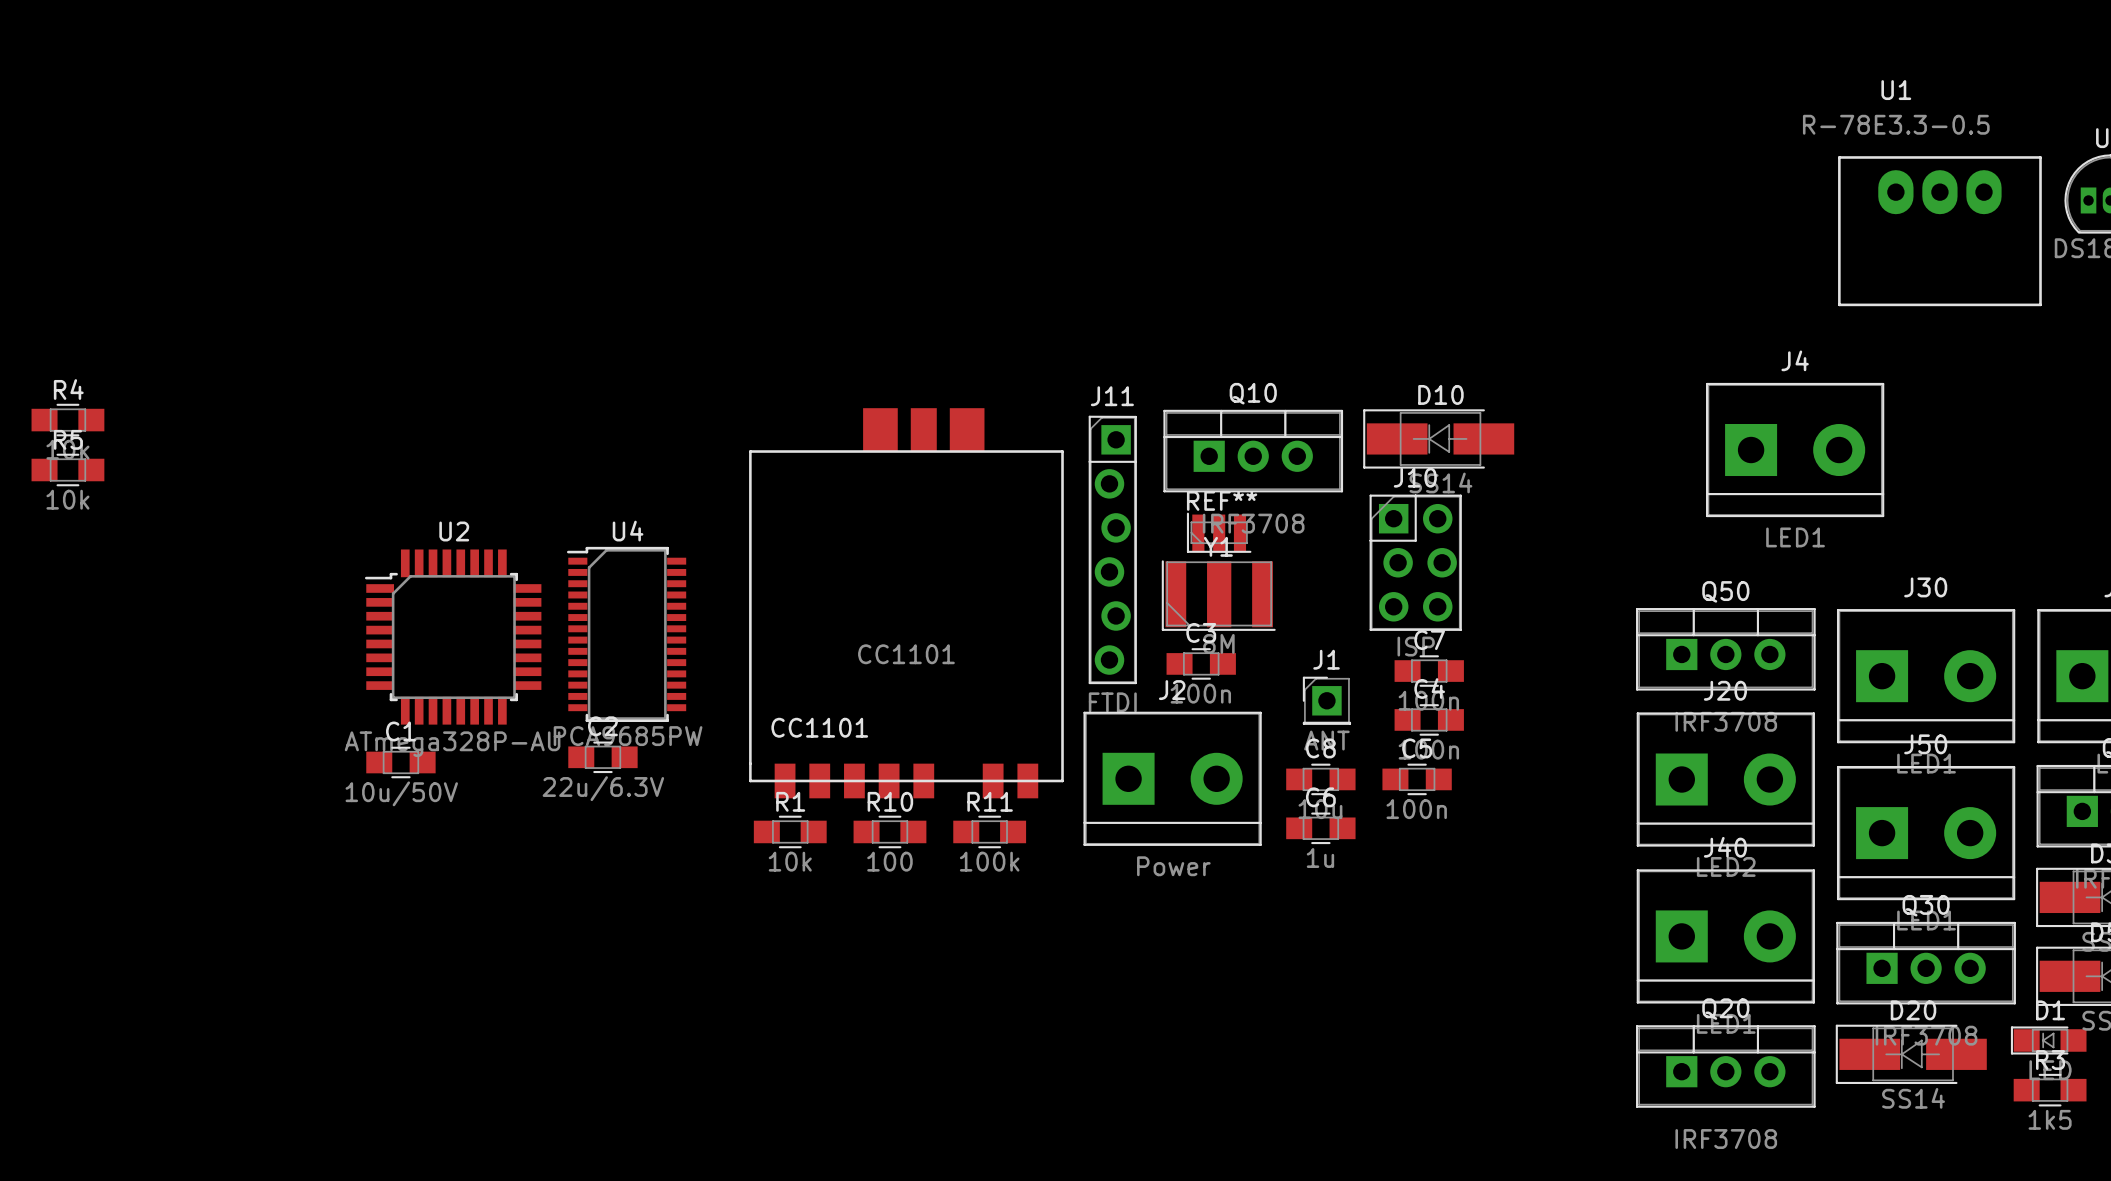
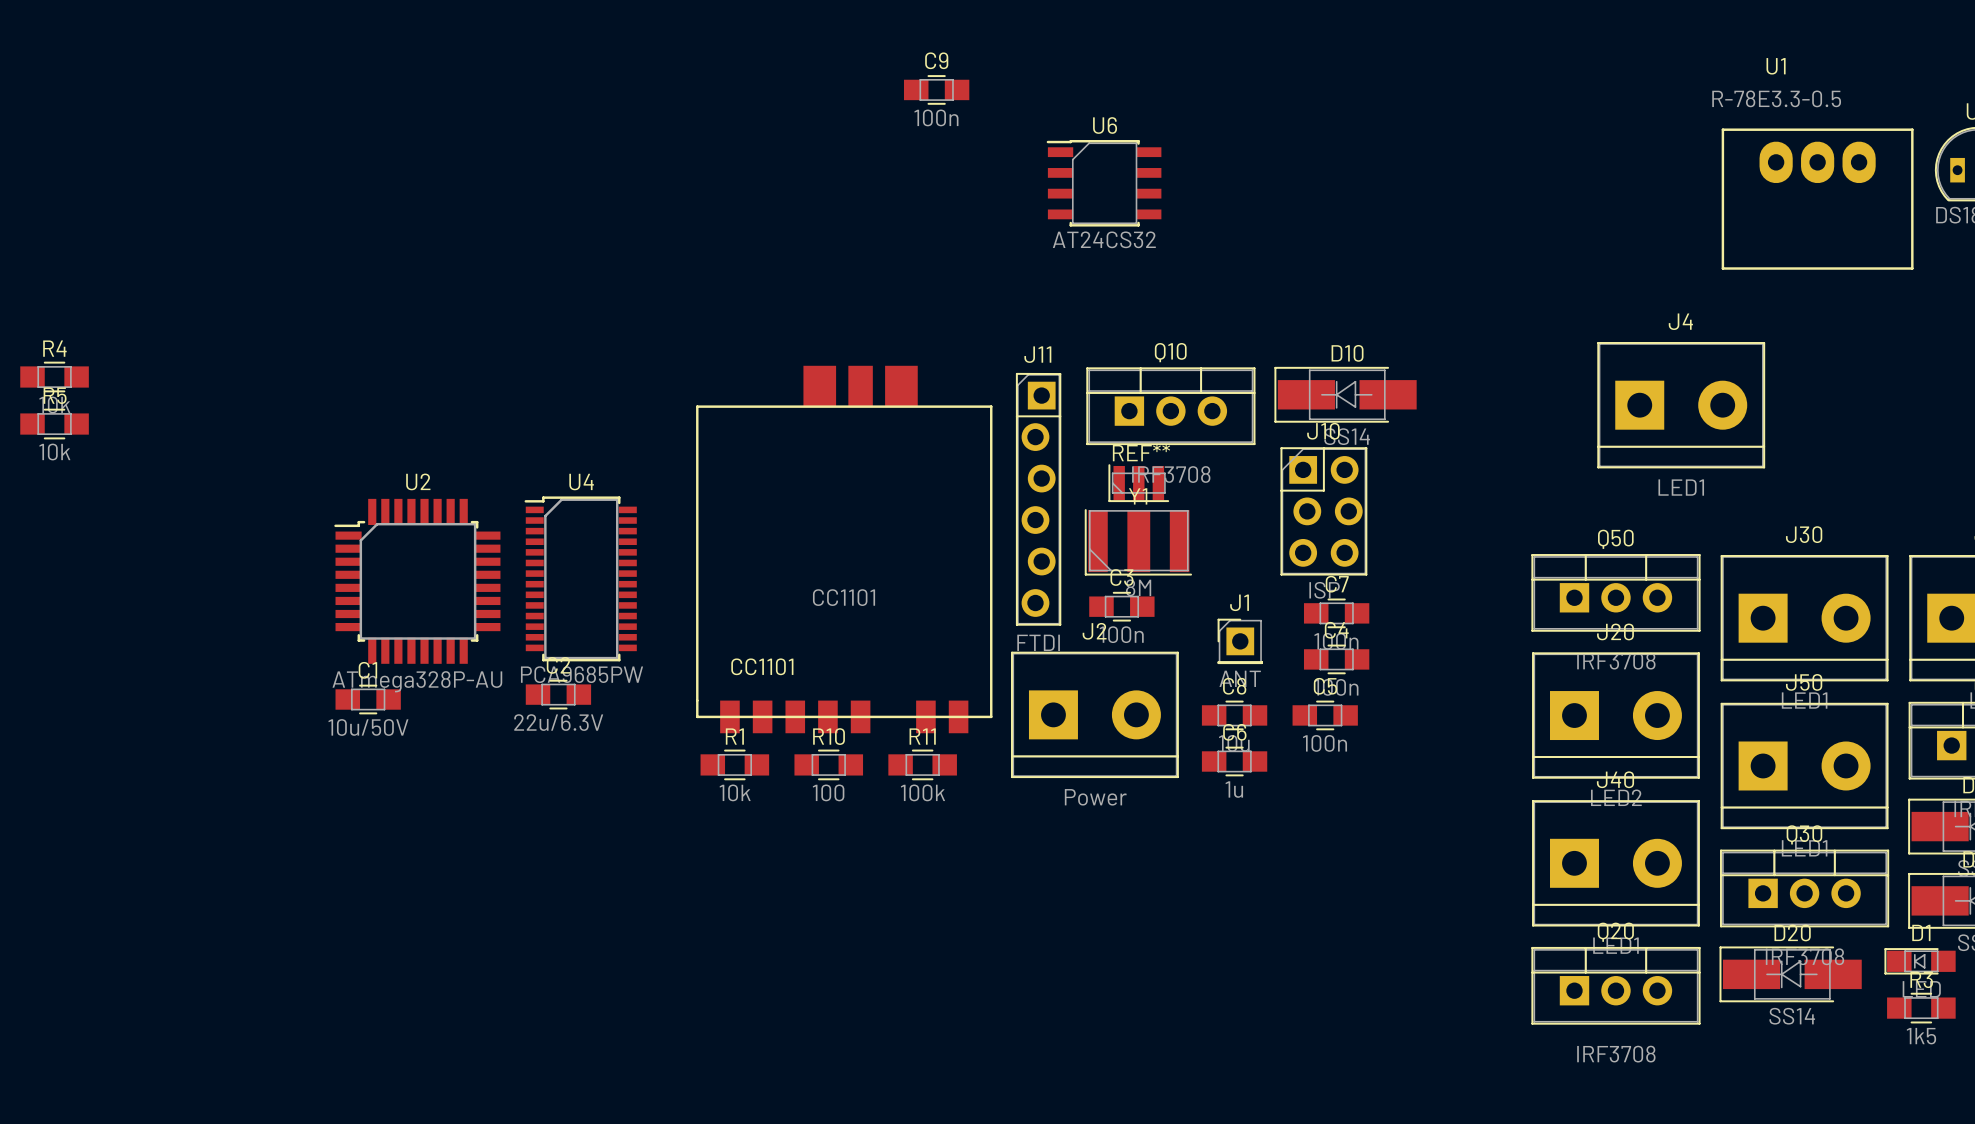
C9: none -> 100n (936, 89)
U6: none -> AT24CS32 (1104, 183)

